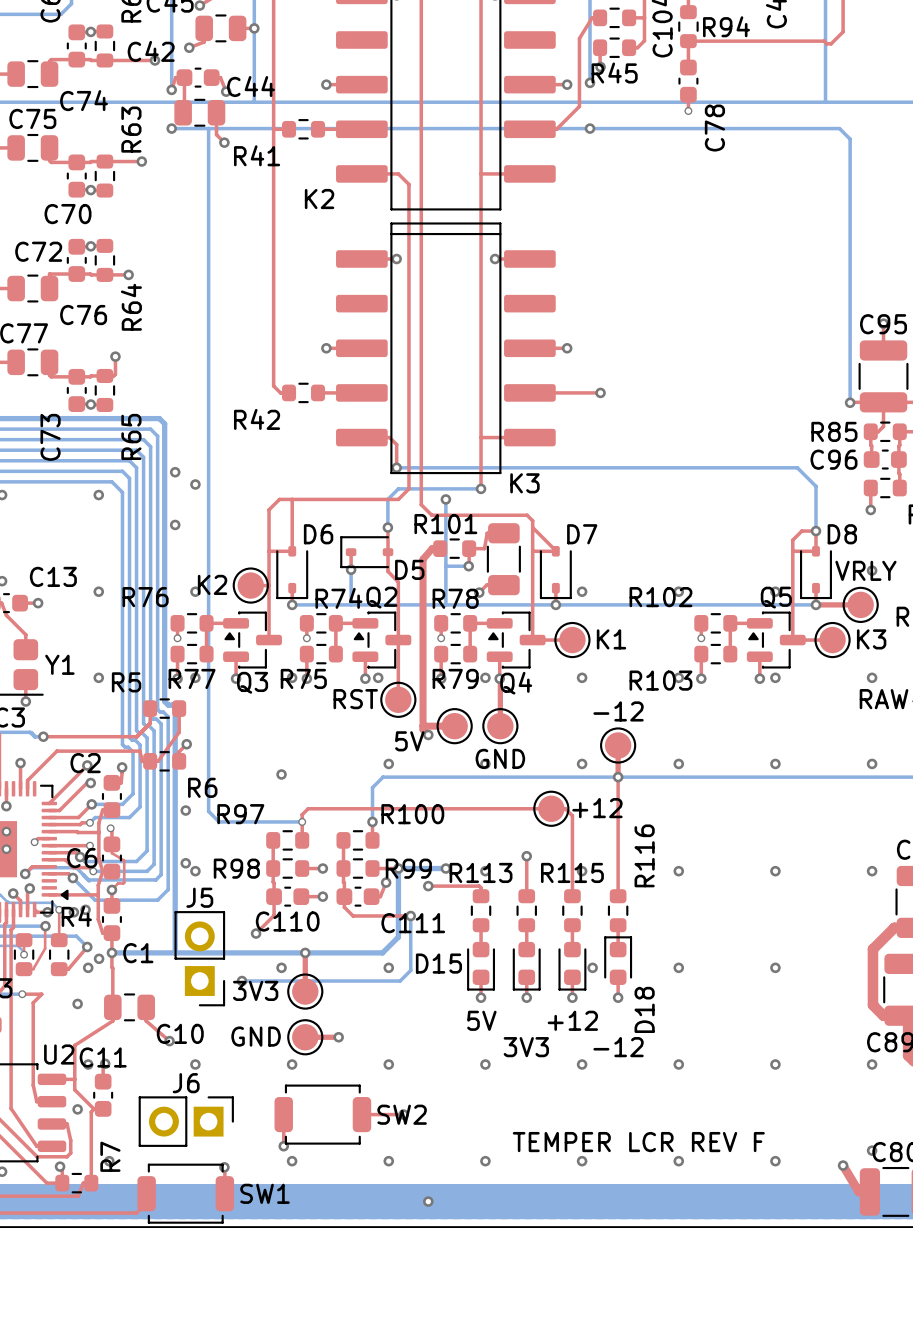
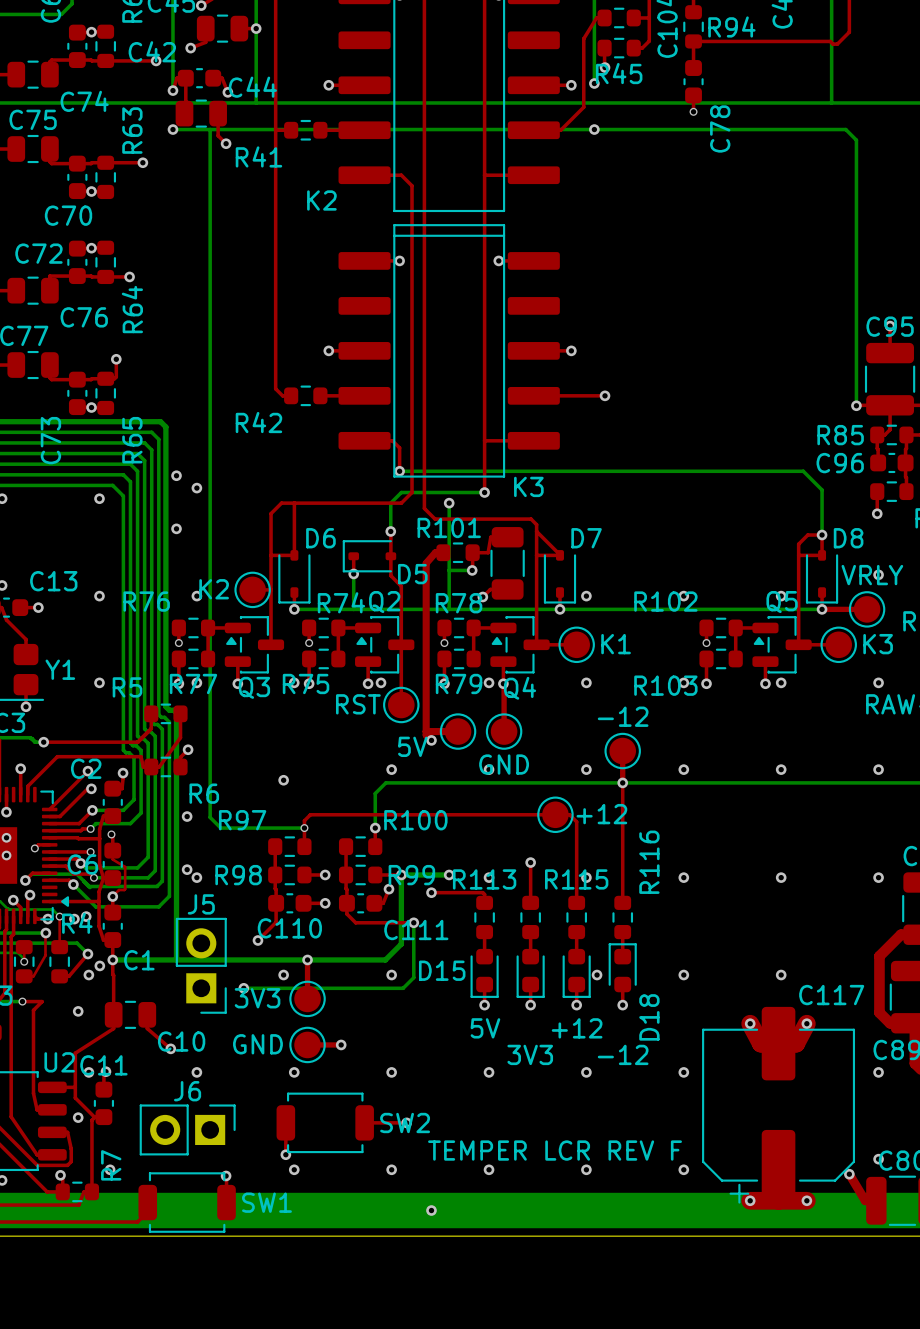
top track: none -> (750, 1023) (760, 1043) (796, 1043) (806, 1023)
via: none -> (750, 1023)
via: none -> (806, 1023)
via: (775, 1064) -> none
C117: none -> (778, 1105)
text position: TEMPER LCR REV F (638, 1142) -> TEMPER LCR REV F (555, 1150)
via: (775, 1161) -> none
top track: none -> (750, 1200) (806, 1200)
via: none -> (750, 1200)
via: none -> (806, 1200)

